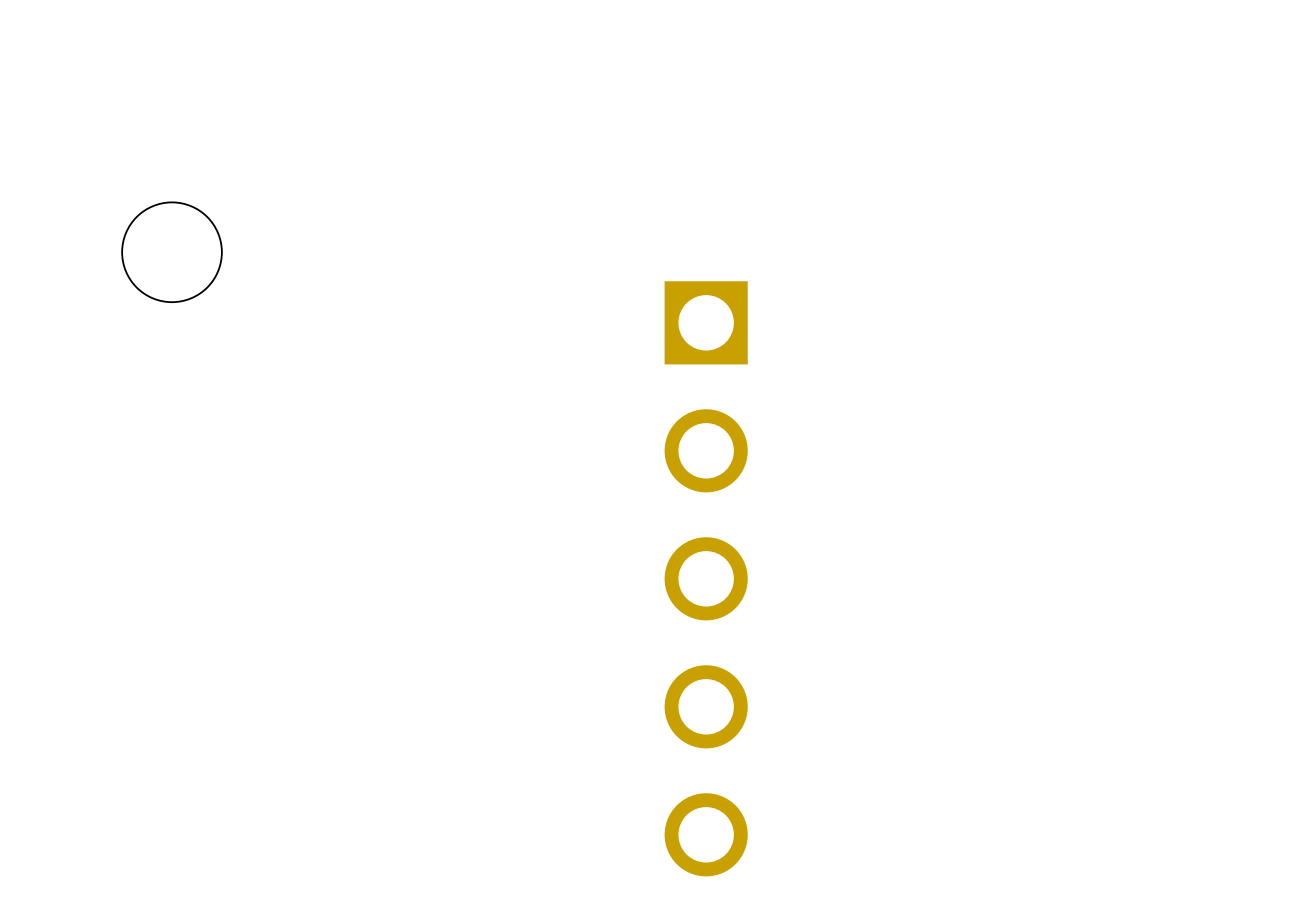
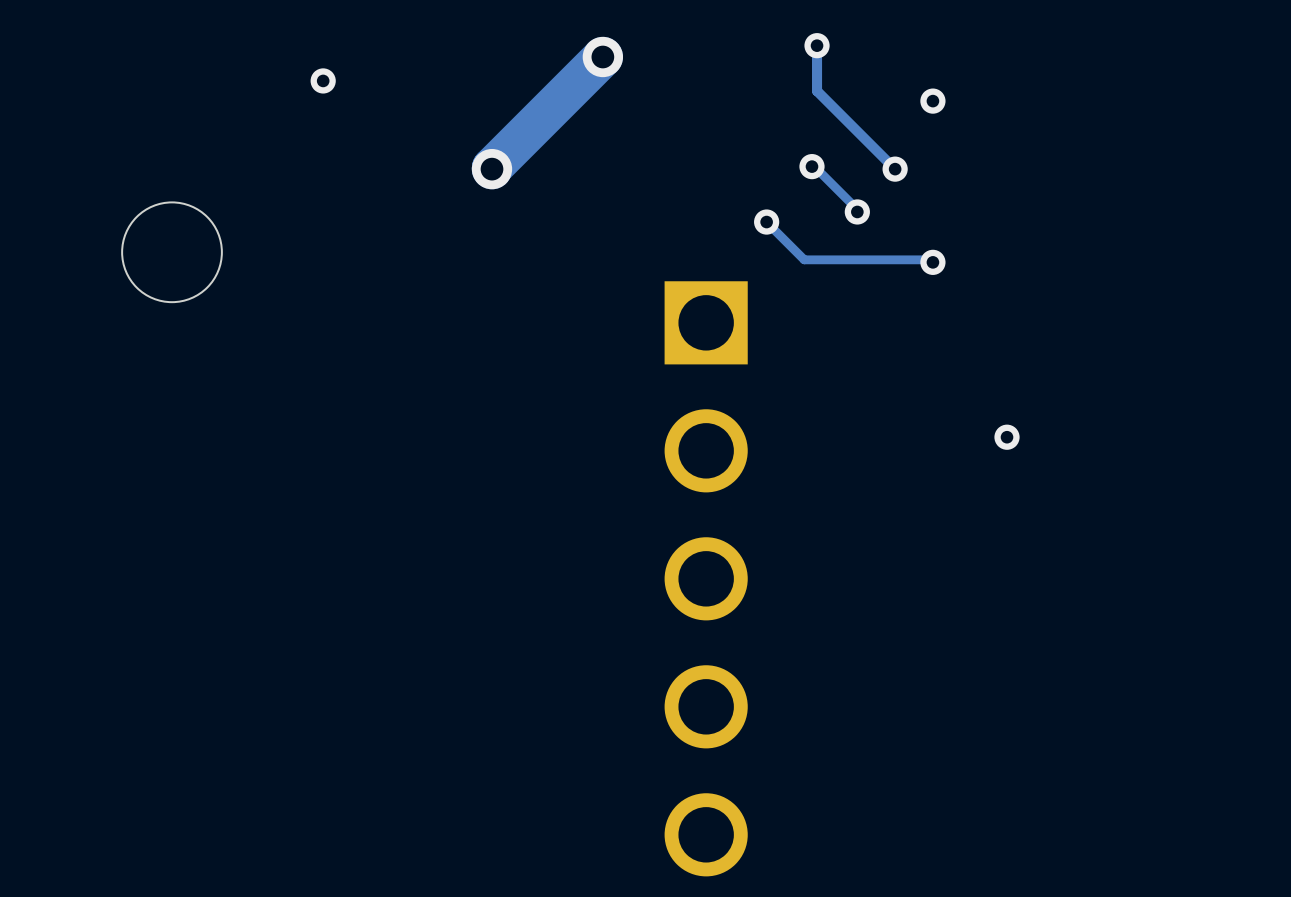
track: none -> (817, 45) (817, 91) (895, 169)
via: none -> (817, 45)
track: none -> (602, 57) (492, 169)
via: none -> (602, 57)
via: none -> (323, 80)
via: none -> (932, 101)
via: none -> (811, 166)
via: none -> (492, 169)
track: none -> (817, 169) (857, 209)
via: none -> (895, 169)
via: none -> (857, 211)
track: none -> (764, 219) (804, 259) (932, 259)
via: none -> (766, 222)
via: none -> (932, 262)
via: none -> (1007, 437)

